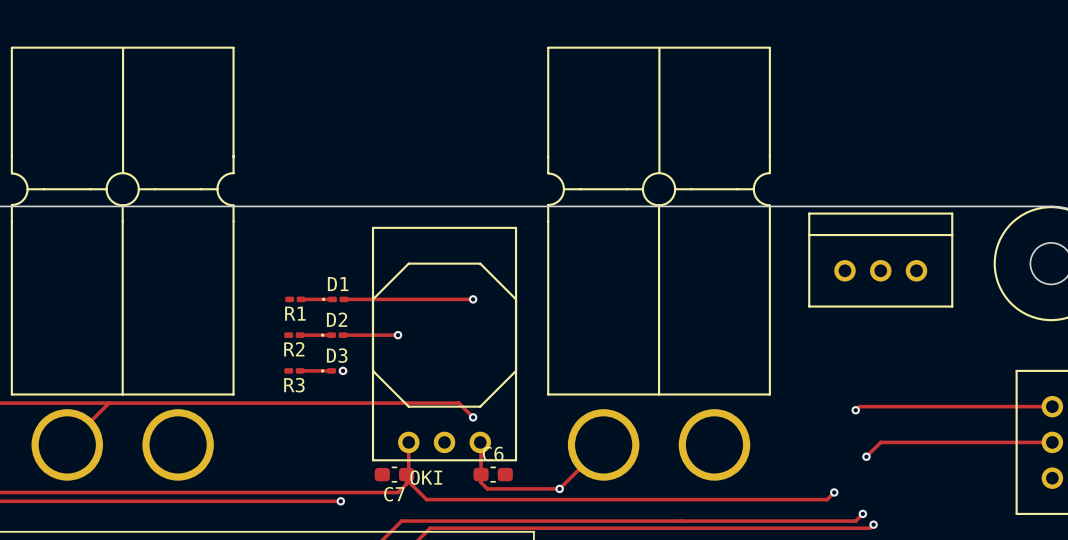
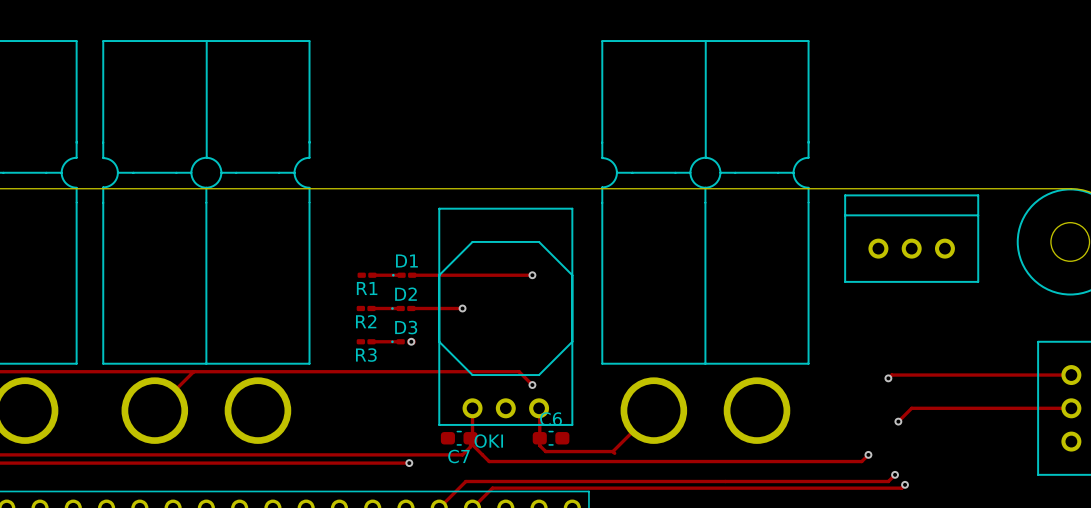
via: (559, 488) -> none

